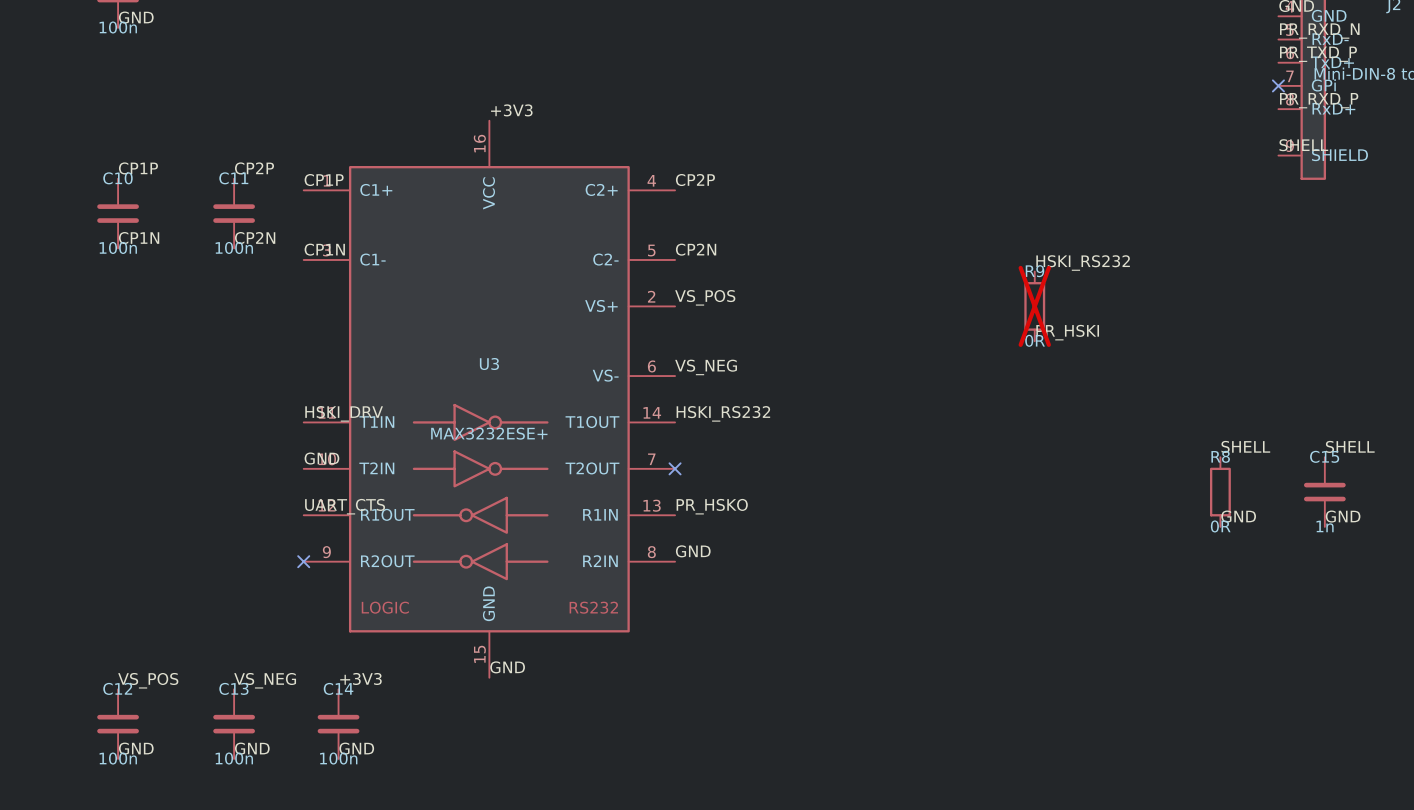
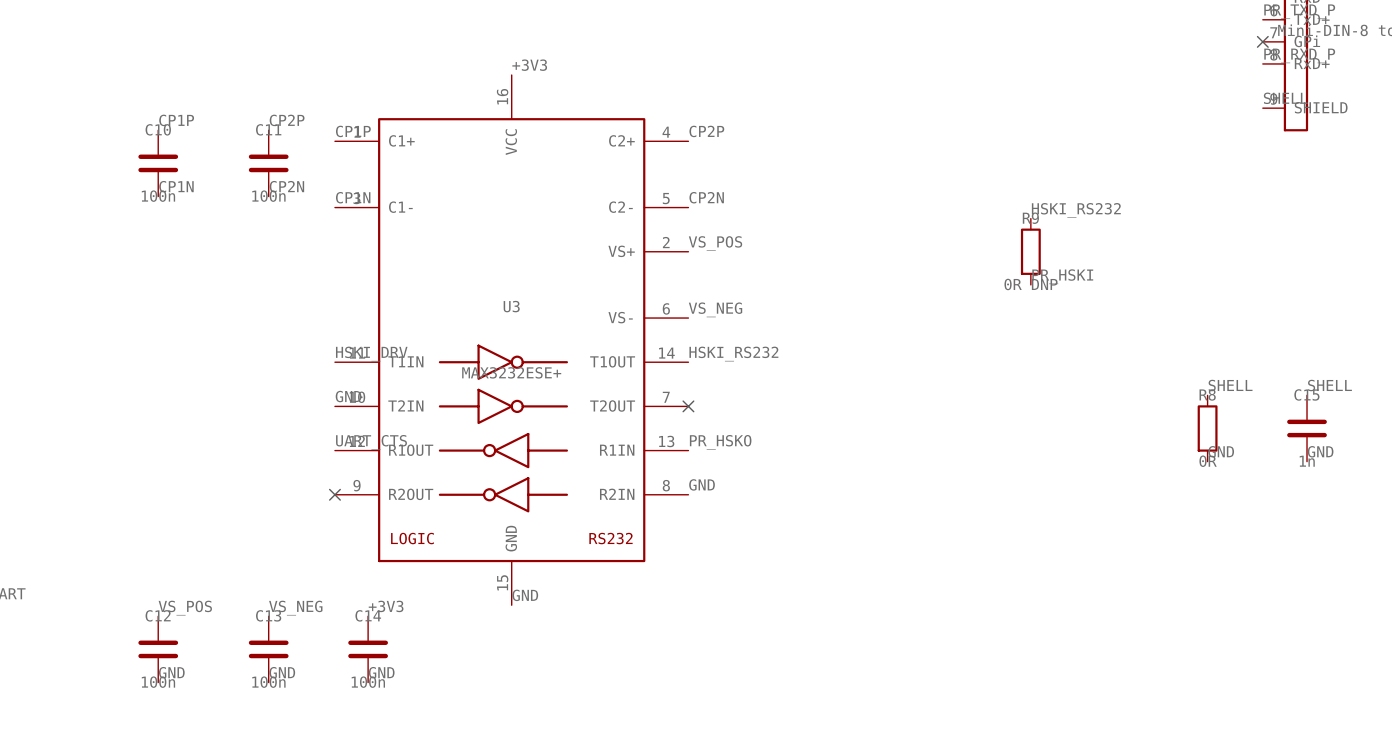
R9 do-not-place cross: (1034, 306) -> none
R9 value: 0R (1035, 340) -> 0R DNP (1031, 284)

